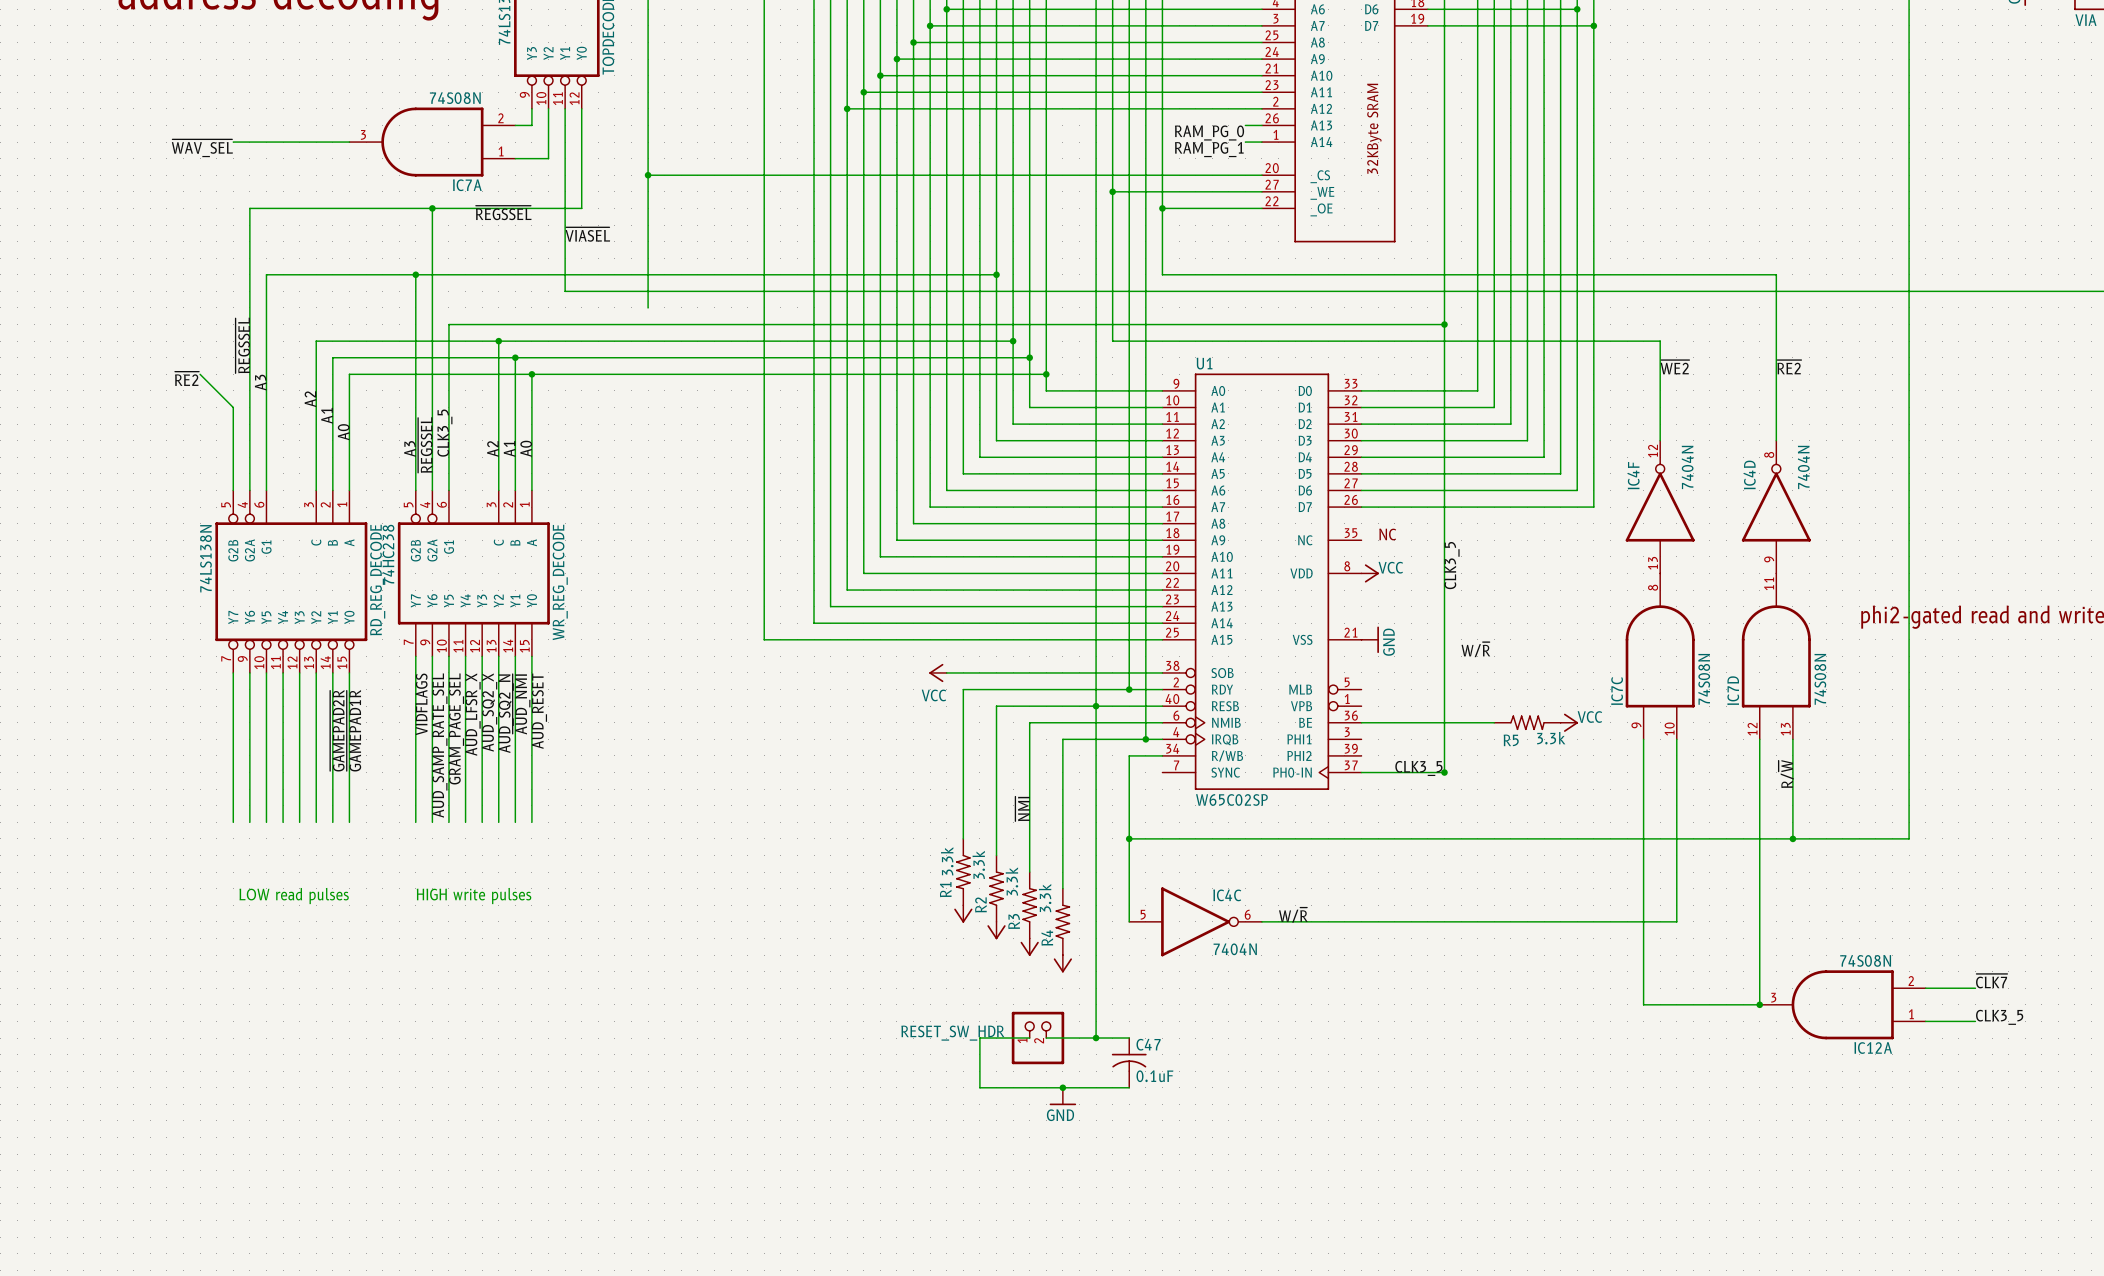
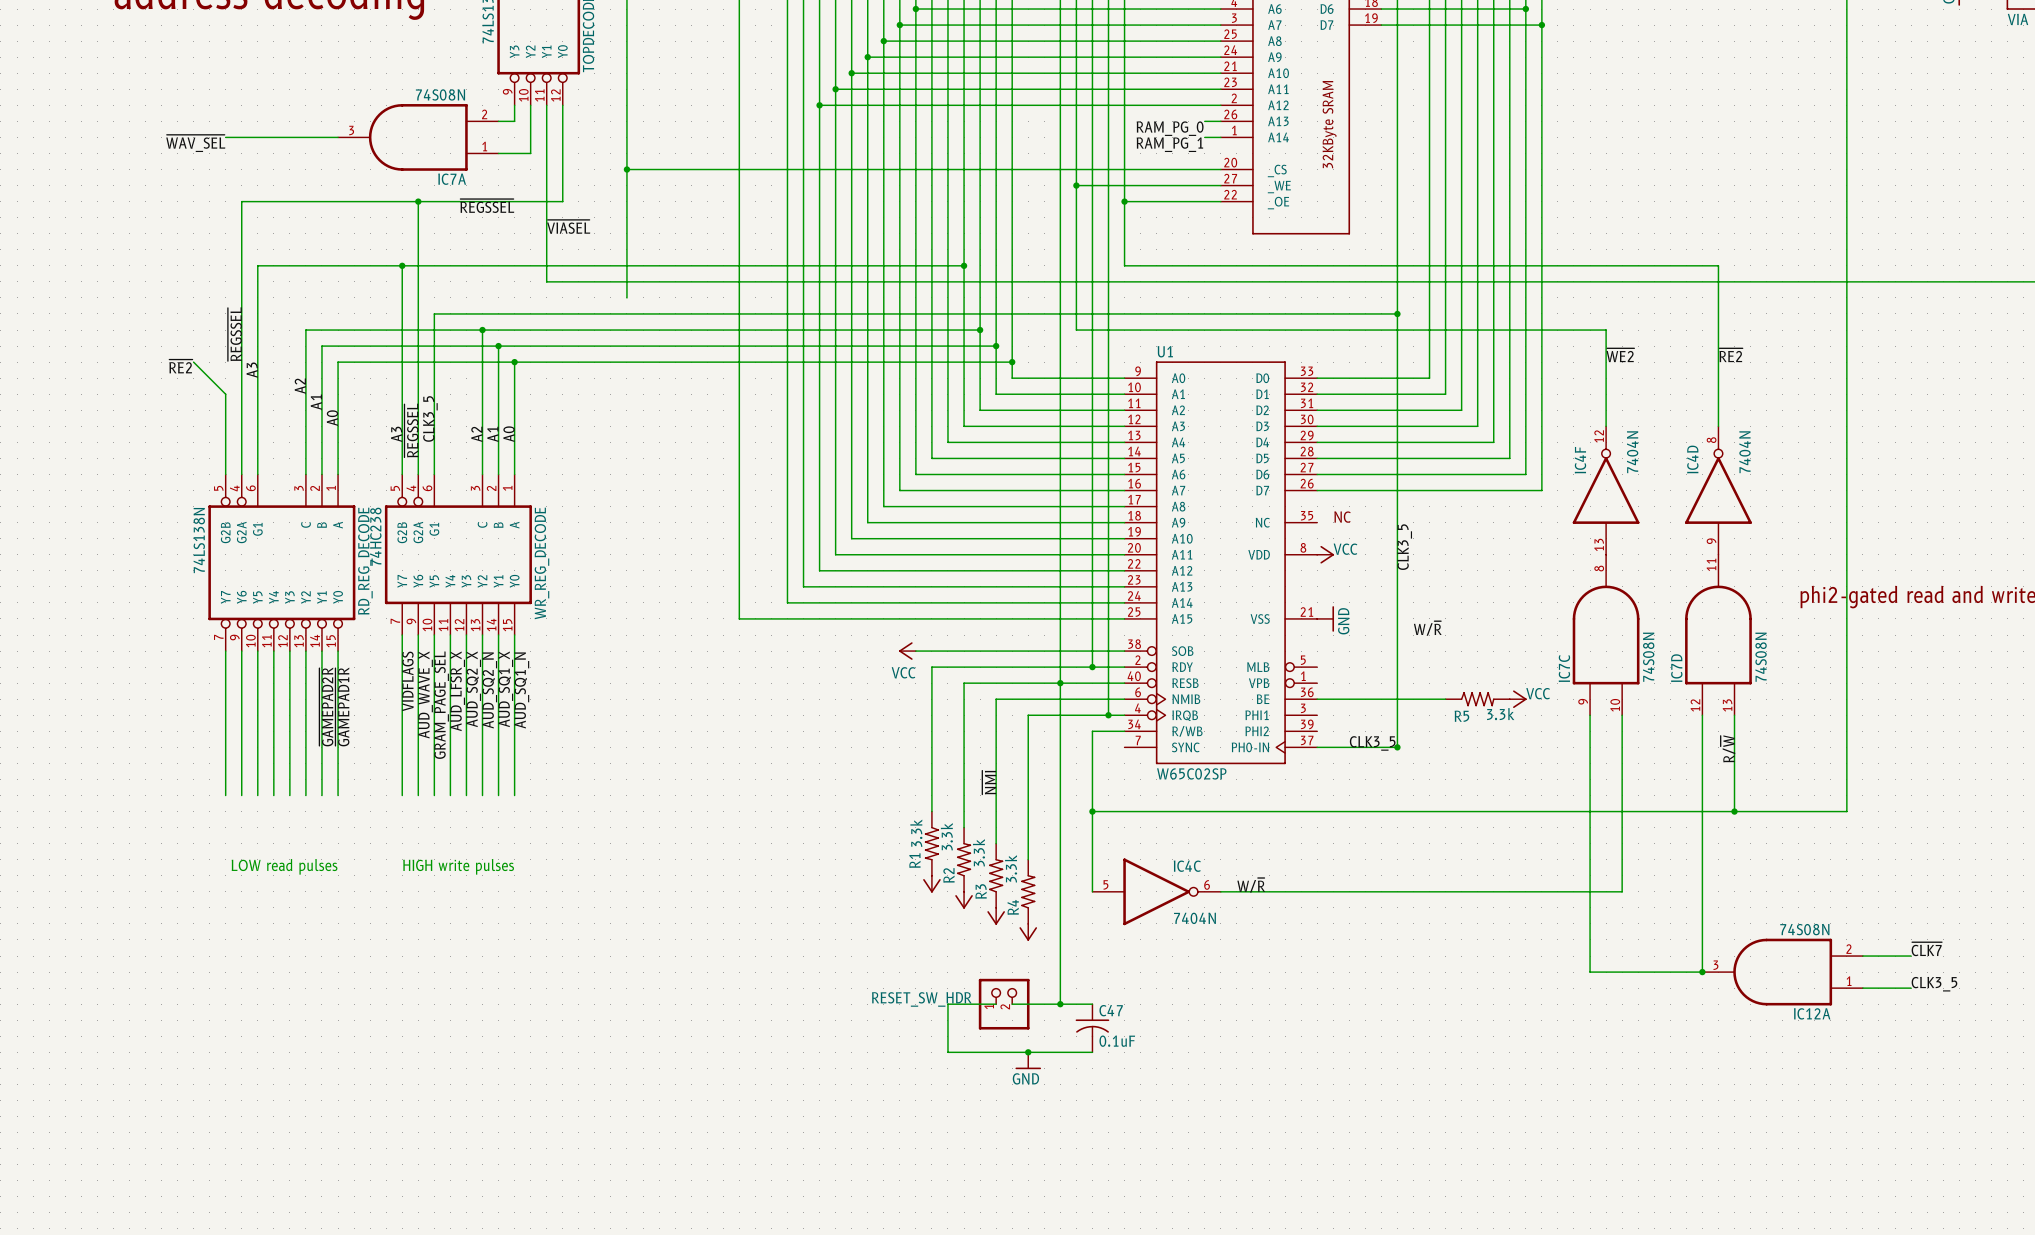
label: ~{AUD_NMI} (521, 704) -> AUD_SQ1_X (505, 689)
label: AUD_RESET (539, 711) -> AUD_SQ1_N (521, 690)
label: AUD_SAMP_RATE_SEL (439, 745) -> AUD_WAVE_X (425, 694)

